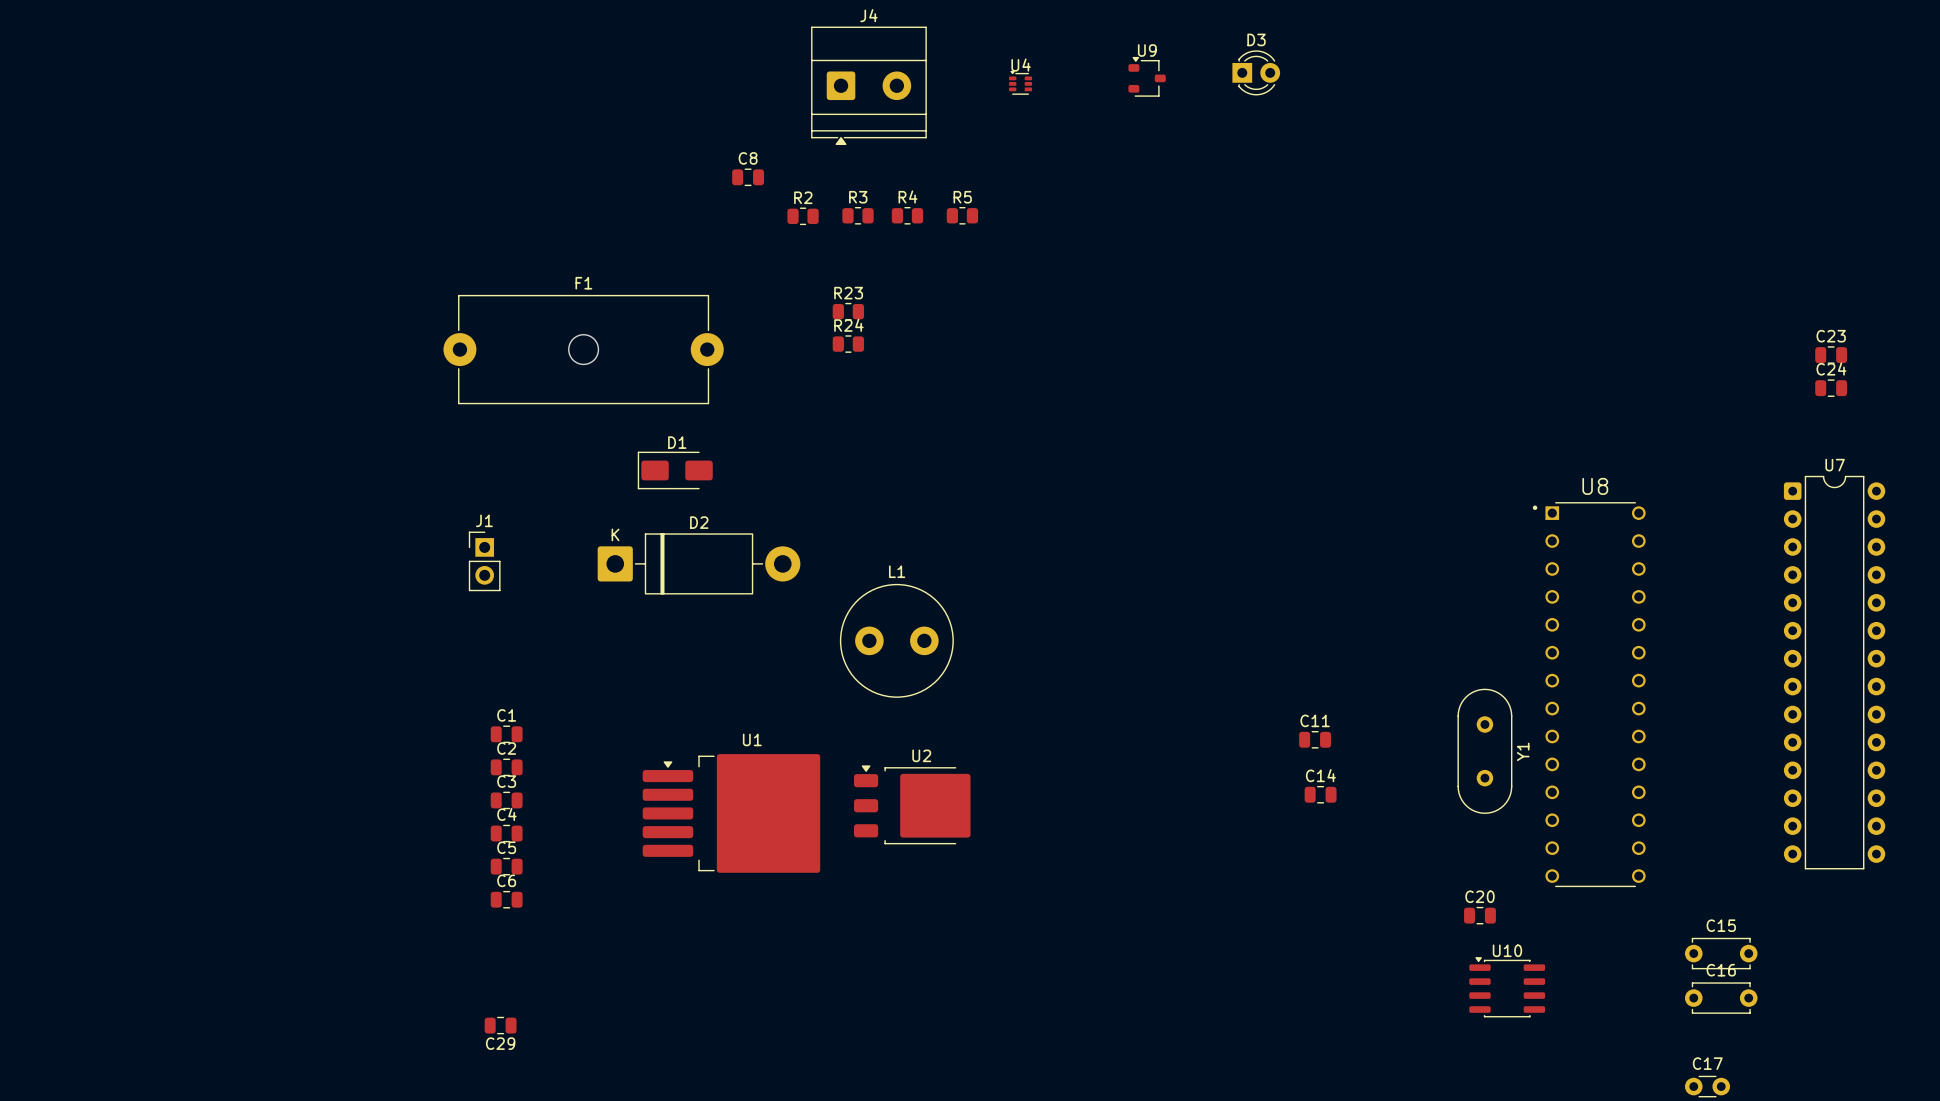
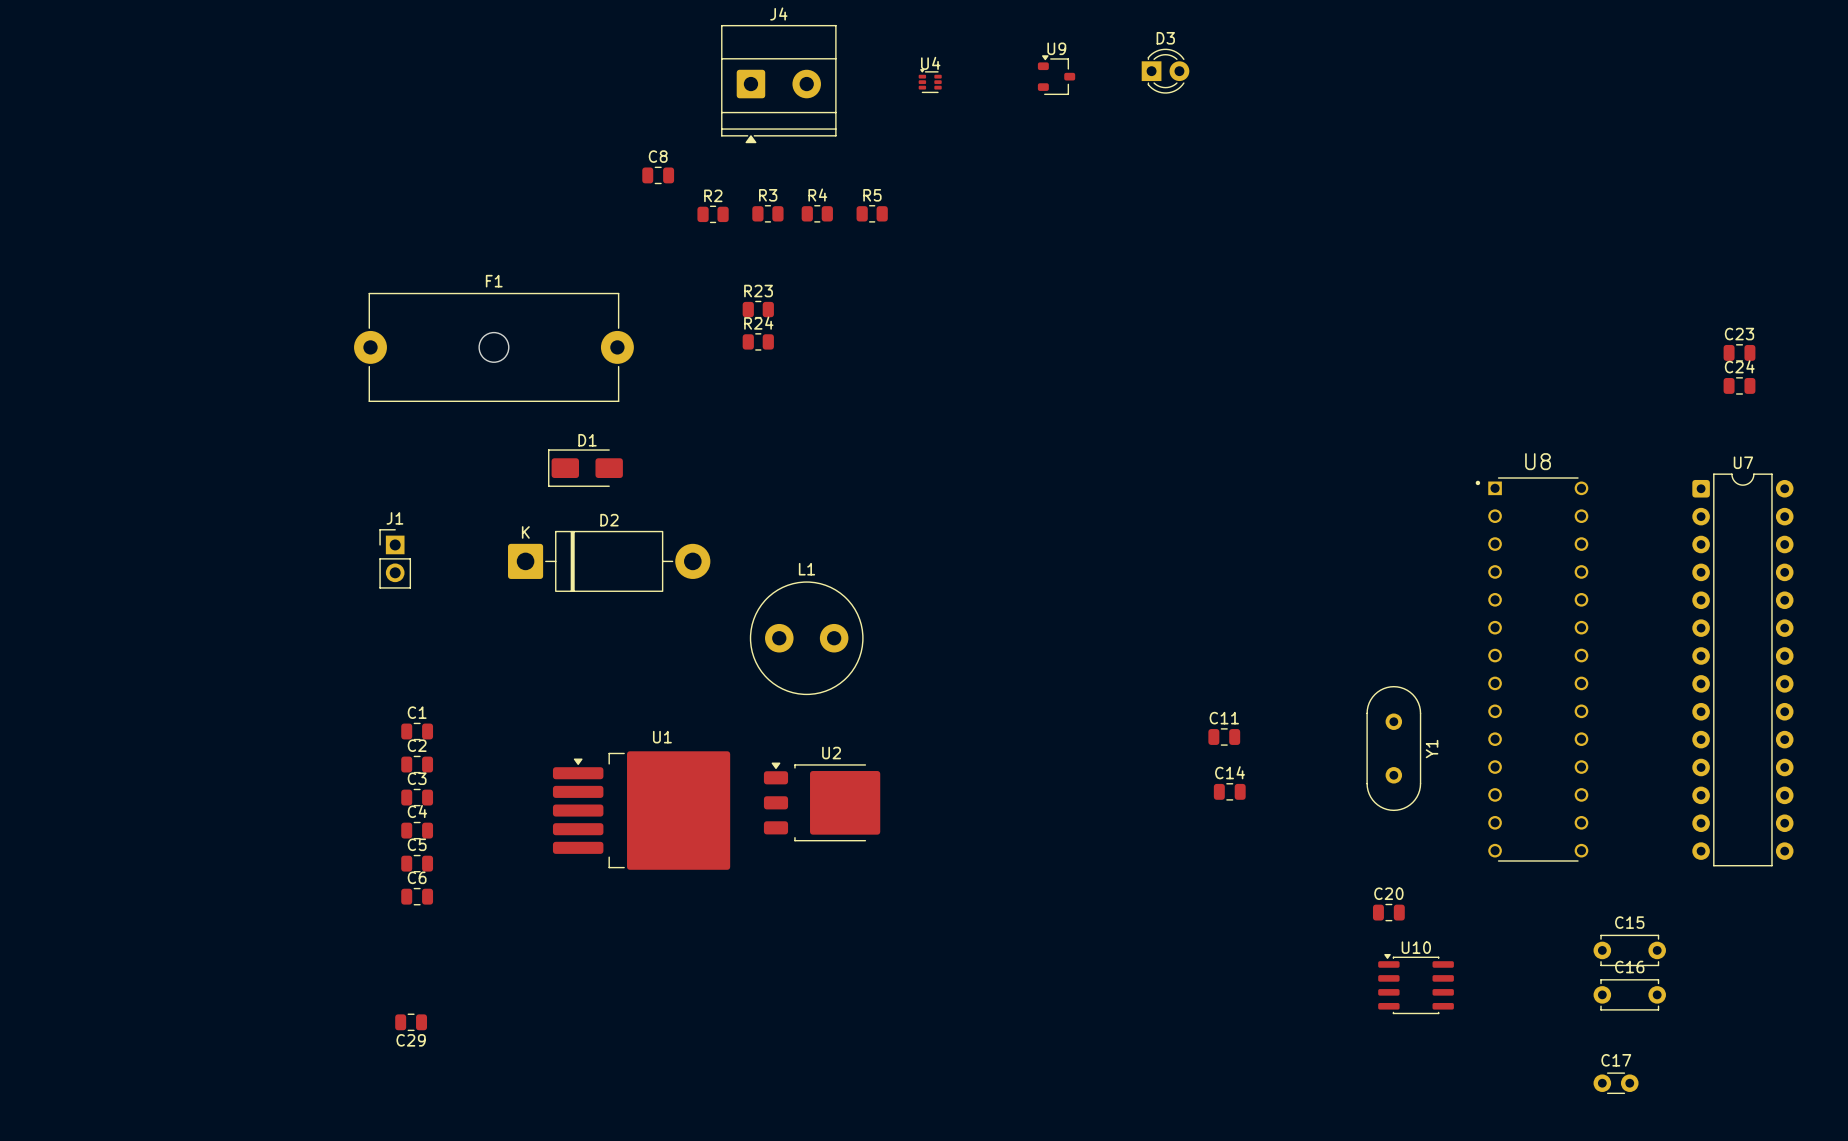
U8 position: (1589, 694) -> (1532, 669)

